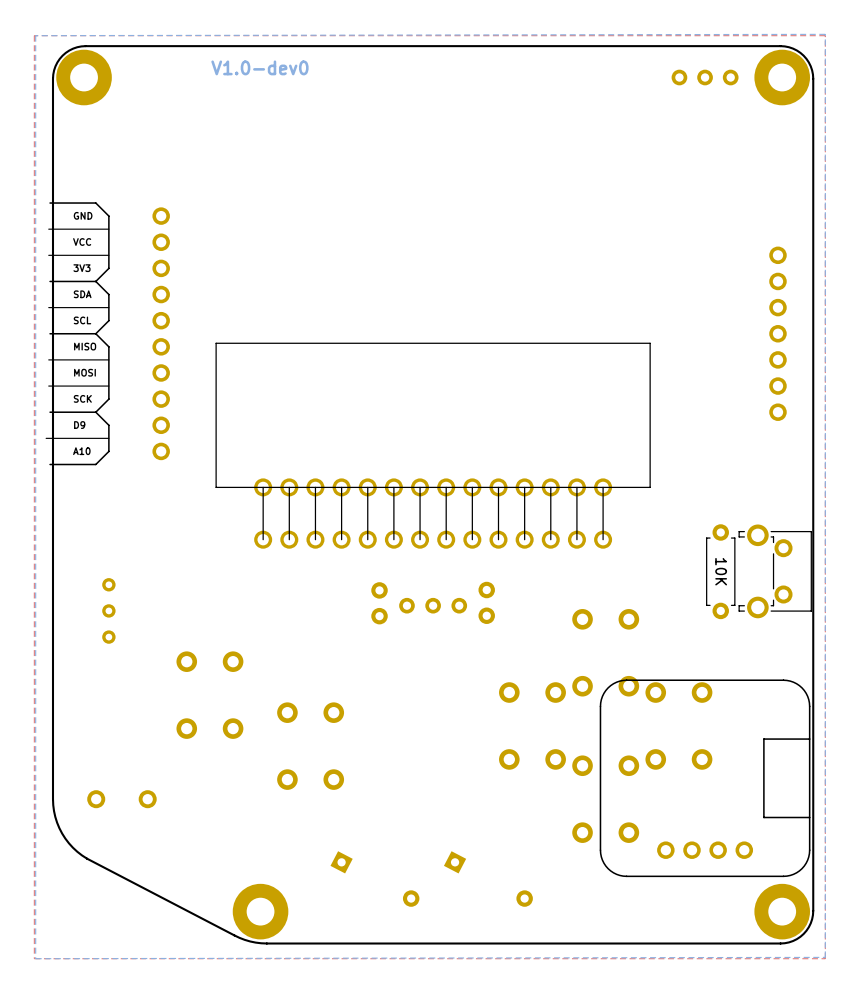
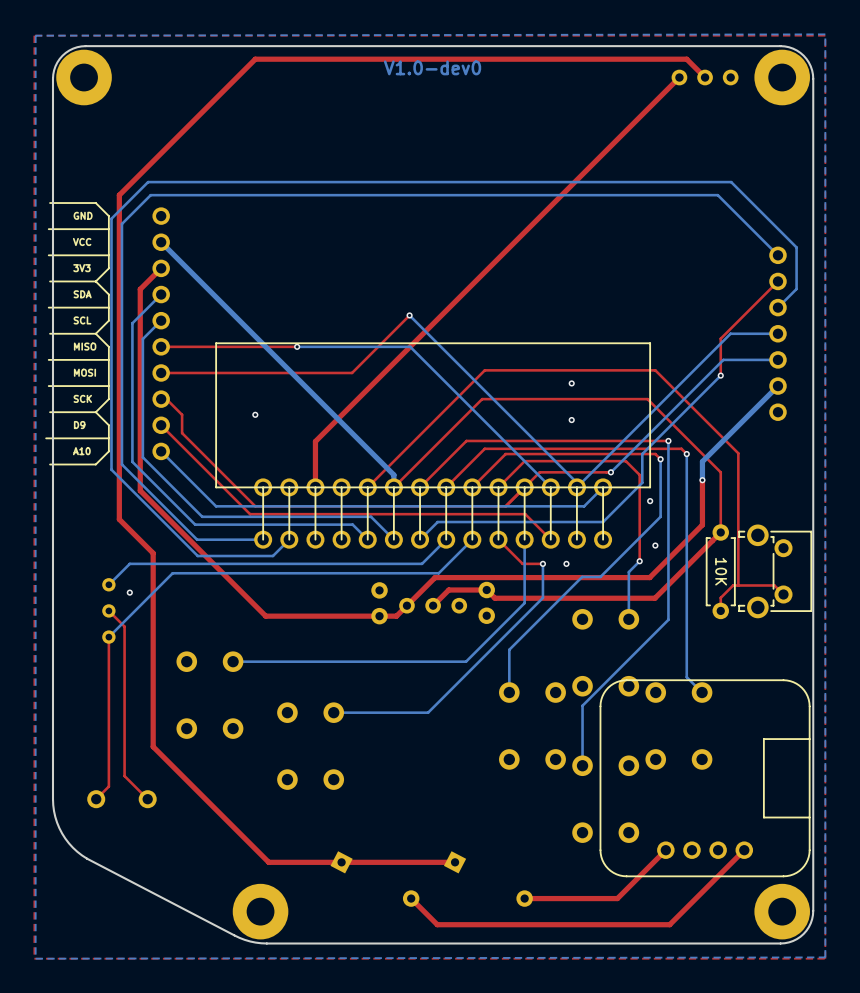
text position: V1.0-dev0 (259, 67) -> V1.0-dev0 (432, 67)
top track: none -> (679, 77) (315, 441) (315, 487)
top track: none -> (705, 77) (686, 59) (255, 59) (119, 195) (119, 519) (153, 553) (153, 746) (268, 862) (455, 862)
bottom track: none -> (161, 242) (393, 474) (393, 487)
bottom track: none -> (777, 255) (717, 195) (150, 195) (121, 223) (121, 464) (197, 539) (263, 539)
top track: none -> (161, 268) (140, 289) (140, 490) (265, 616) (396, 616) (435, 577) (649, 577) (702, 524) (702, 480)
top track: none -> (777, 281) (720, 338) (720, 375)
bottom track: none -> (161, 294) (132, 323) (132, 461) (195, 524) (352, 524) (367, 539)
bottom track: none -> (777, 307) (796, 289) (796, 247) (731, 182) (148, 182) (111, 218) (111, 469) (197, 556) (272, 556) (289, 539)
top track: none -> (409, 315) (352, 372) (161, 372)
bottom track: none -> (409, 315) (576, 482) (576, 487) (730, 333) (777, 333)
via: none -> (409, 315)
bottom track: none -> (161, 320) (142, 338) (142, 457) (202, 516) (371, 516) (393, 539)
top track: none -> (297, 346) (161, 346)
bottom track: none -> (297, 346) (410, 346) (550, 487)
via: none -> (297, 346)
bottom track: none -> (777, 359) (723, 359) (610, 472)
bottom track: none -> (720, 375) (642, 454) (642, 482) (603, 522) (437, 522) (420, 539)
via: none -> (720, 375)
via: none -> (571, 383)
bottom track: none -> (777, 386) (702, 461) (702, 480)
top track: none -> (161, 403) (161, 399) (166, 399) (182, 414) (182, 433) (255, 506) (505, 506) (539, 472) (610, 472)
via: none -> (255, 414)
via: none -> (571, 420)
top track: none -> (161, 425) (250, 514) (525, 514) (550, 539)
top track: none -> (668, 440) (466, 440) (420, 487)
bottom track: none -> (668, 440) (668, 619) (582, 705) (582, 765)
via: none -> (668, 440)
bottom track: none -> (161, 451) (216, 506) (584, 506) (603, 487)
top track: none -> (686, 454) (681, 448) (484, 448) (446, 487)
bottom track: none -> (686, 454) (686, 677) (702, 692)
via: none -> (686, 454)
top track: none -> (660, 459) (655, 454) (505, 454) (472, 487)
bottom track: none -> (660, 459) (660, 516) (600, 576) (582, 576) (509, 649) (509, 692)
via: none -> (660, 459)
via: none -> (610, 472)
via: none -> (702, 480)
top track: none -> (367, 487) (484, 370) (655, 370) (738, 453) (738, 585)
top track: none -> (393, 487) (482, 399) (647, 399) (720, 472) (720, 532) (654, 598) (494, 598) (486, 590) (448, 590) (433, 605)
top track: none -> (498, 487) (524, 461) (625, 461) (639, 474) (639, 561)
via: none -> (650, 501)
bottom track: none -> (446, 539) (422, 563) (129, 563) (108, 584)
bottom track: none -> (472, 539) (438, 573) (172, 573) (108, 637)
top track: none -> (498, 539) (522, 563) (542, 563)
bottom track: none -> (524, 539) (524, 603) (466, 661) (233, 661)
via: none -> (655, 545)
bottom track: none -> (639, 561) (628, 572) (628, 619)
via: none -> (639, 561)
bottom track: none -> (542, 563) (542, 597) (428, 712) (333, 712)
via: none -> (542, 563)
via: none -> (566, 563)
via: none -> (129, 592)
top track: none -> (783, 594) (774, 585) (733, 585) (720, 597) (720, 610)
top track: none -> (108, 610) (124, 626) (124, 776) (147, 799)
top track: none -> (108, 637) (108, 786) (96, 799)
top track: none -> (665, 850) (617, 898) (524, 898)
top track: none -> (744, 850) (669, 924) (437, 924) (411, 898)

